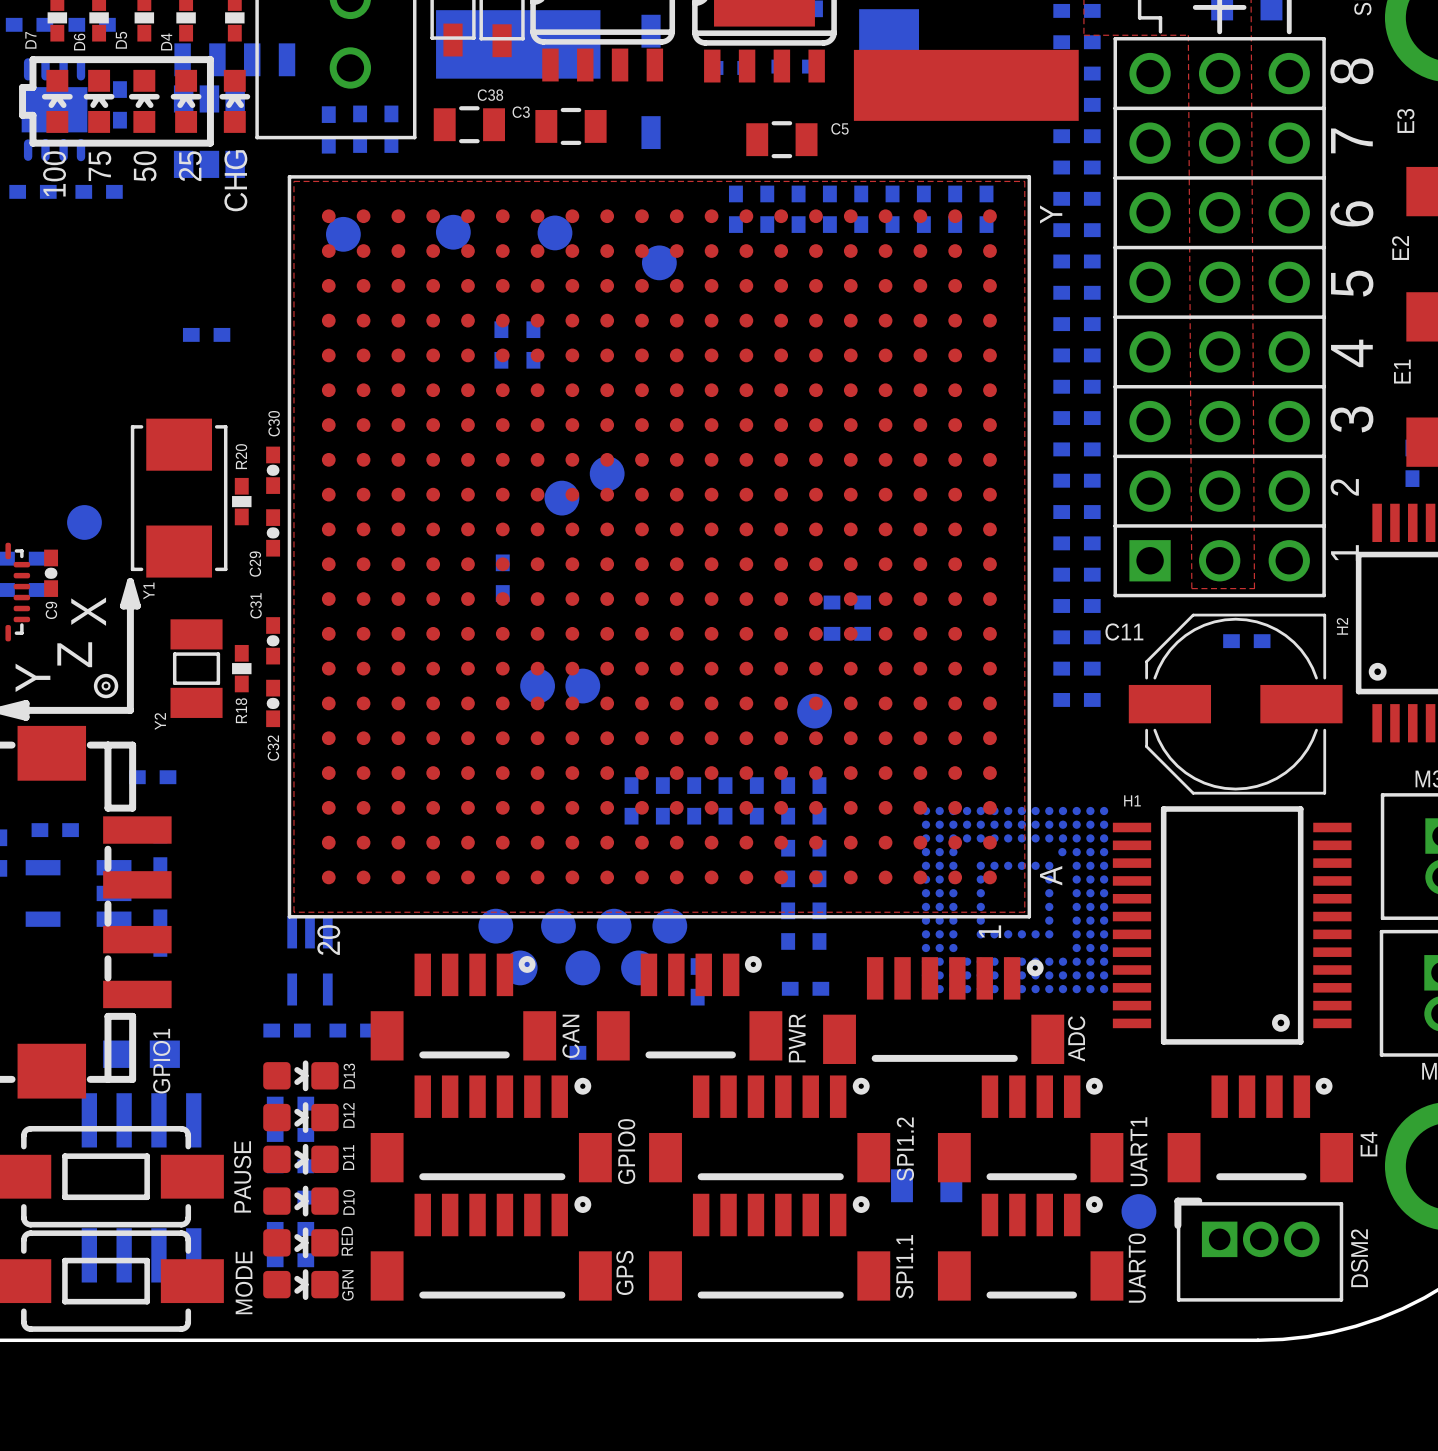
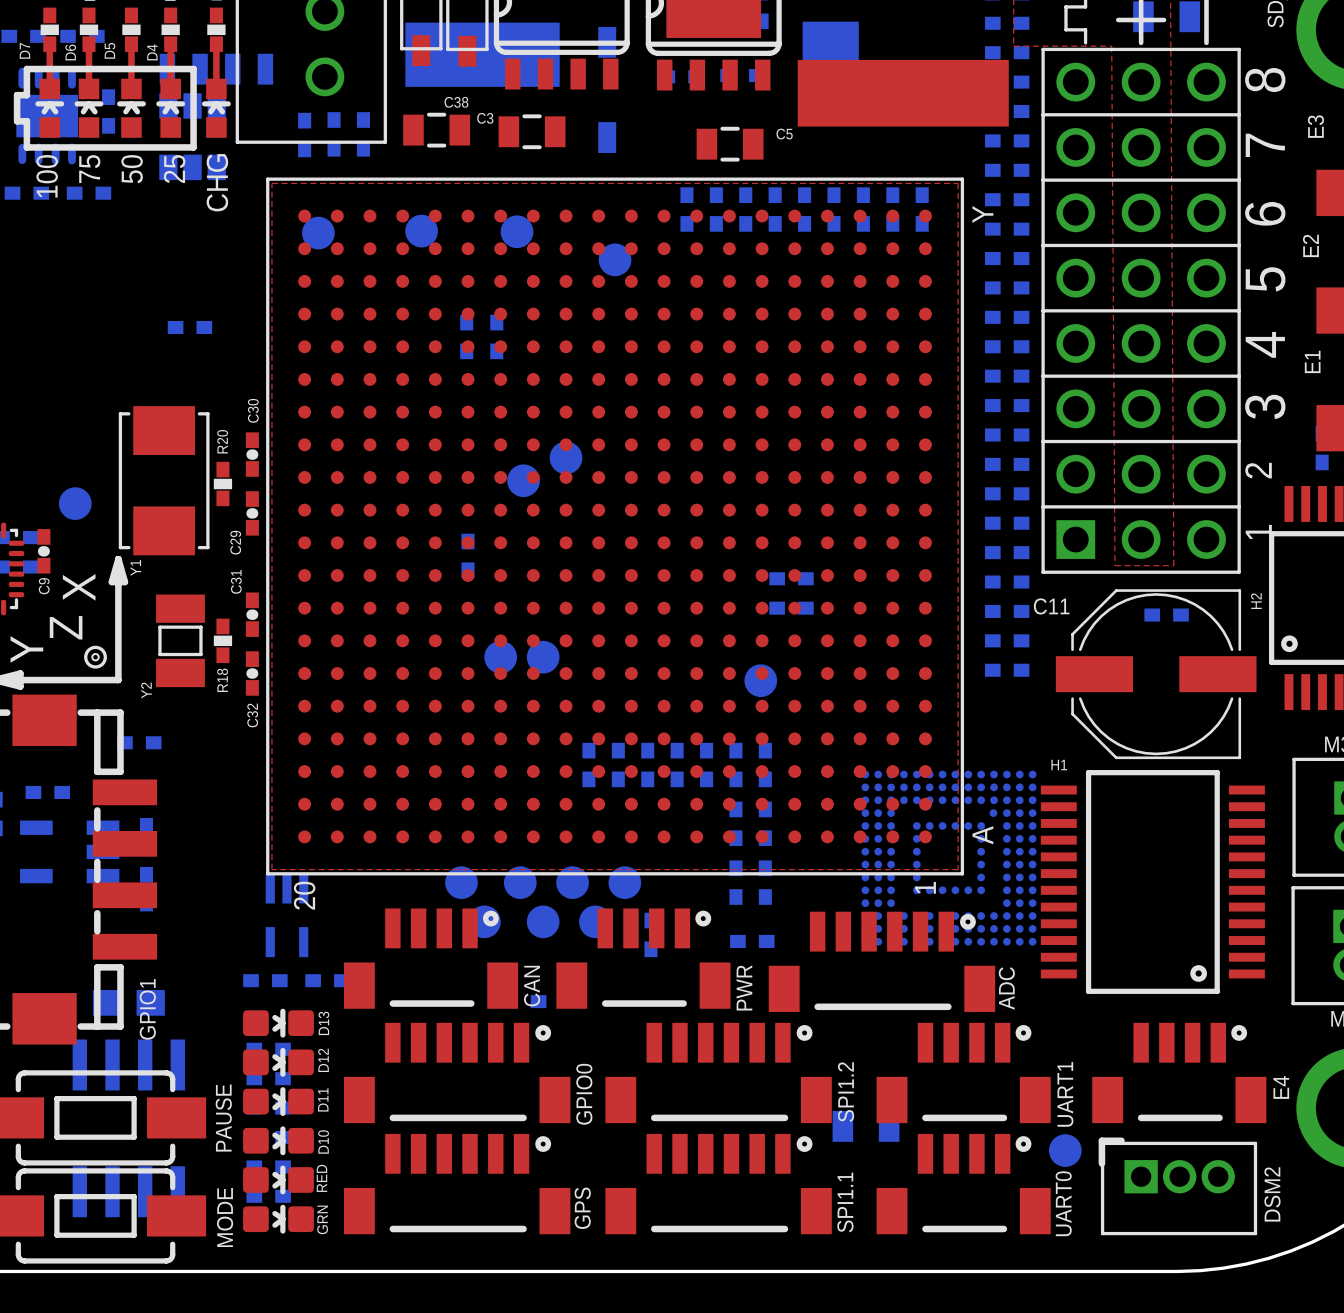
top track: none -> (49, 44) (49, 88)
top track: none -> (88, 44) (88, 88)
top track: none -> (131, 44) (131, 88)
top track: none -> (170, 44) (170, 88)
top track: none -> (216, 44) (216, 88)

